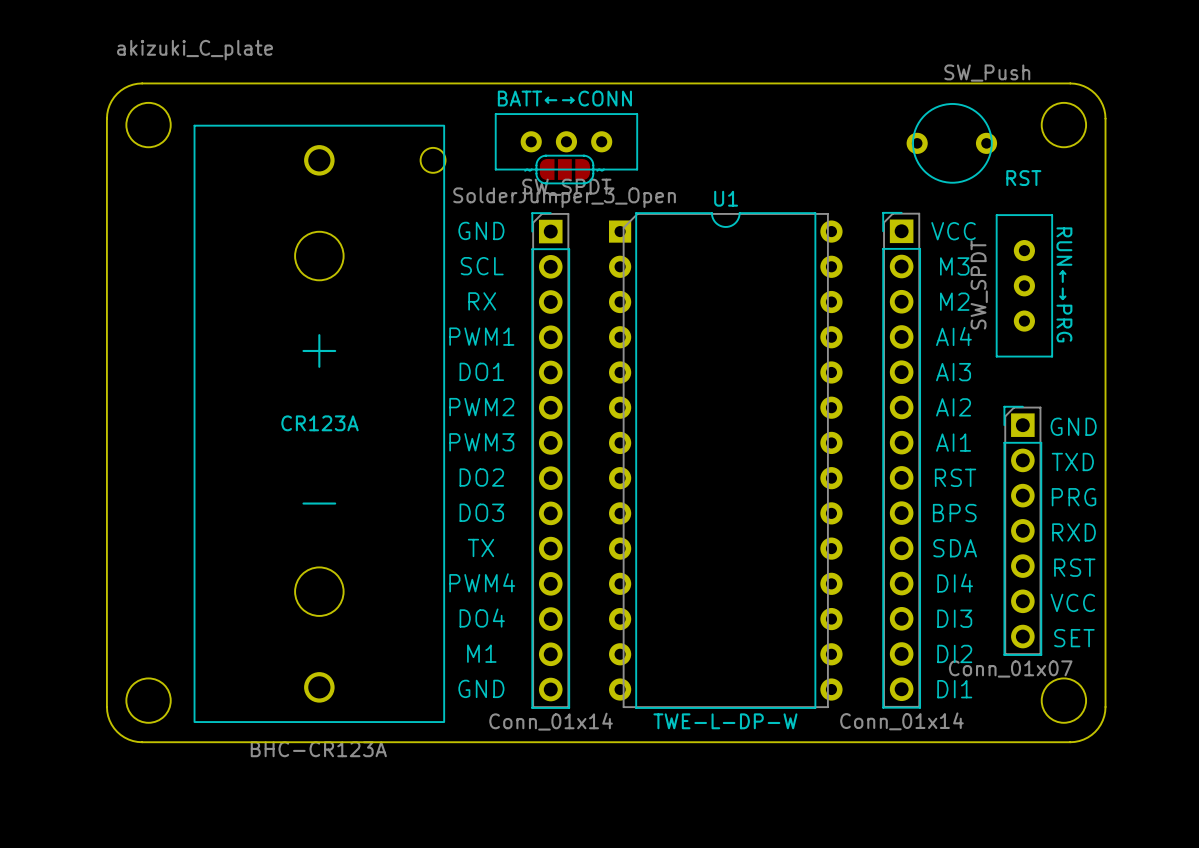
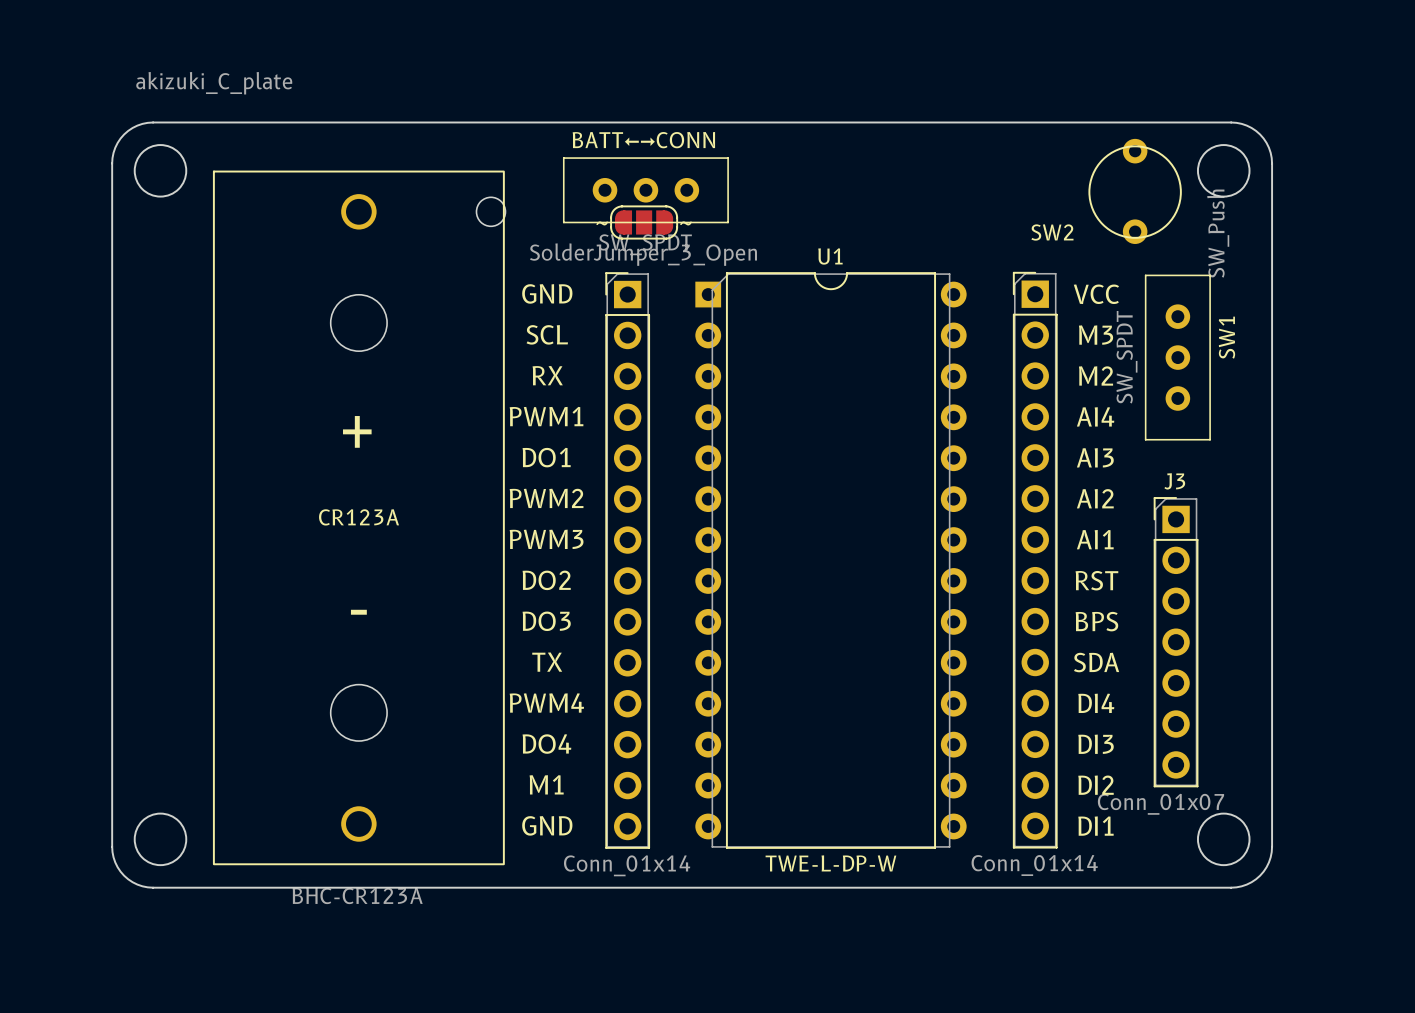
SW2: none -> SW_Push (1135, 191)
RST: SW_Push (951, 143) -> none
RUN←→PRG name: RUN←→PRG (1064, 284) -> SW1 (1226, 337)
J3 name: none -> J3 (1174, 481)
text: GND (1073, 426) -> none
text: TXD (1072, 462) -> none
text: PRG (1074, 497) -> none
text: RXD (1074, 532) -> none
text: RST (1074, 567) -> none
text: VCC (1072, 602) -> none
text: SET (1074, 638) -> none

